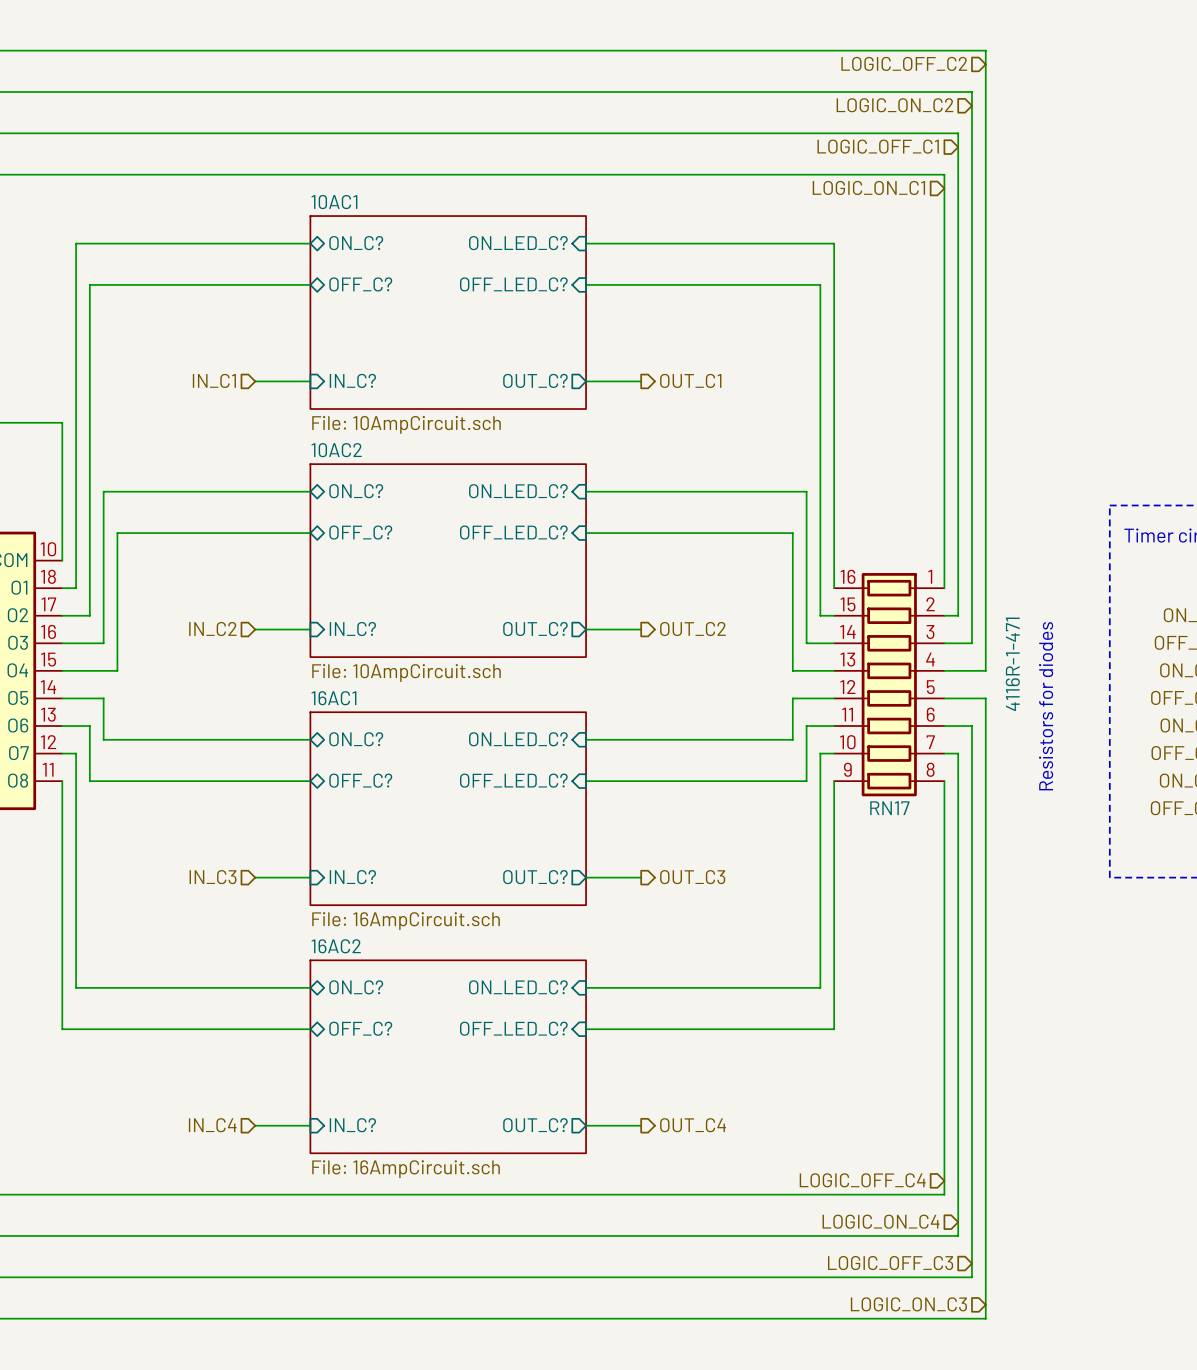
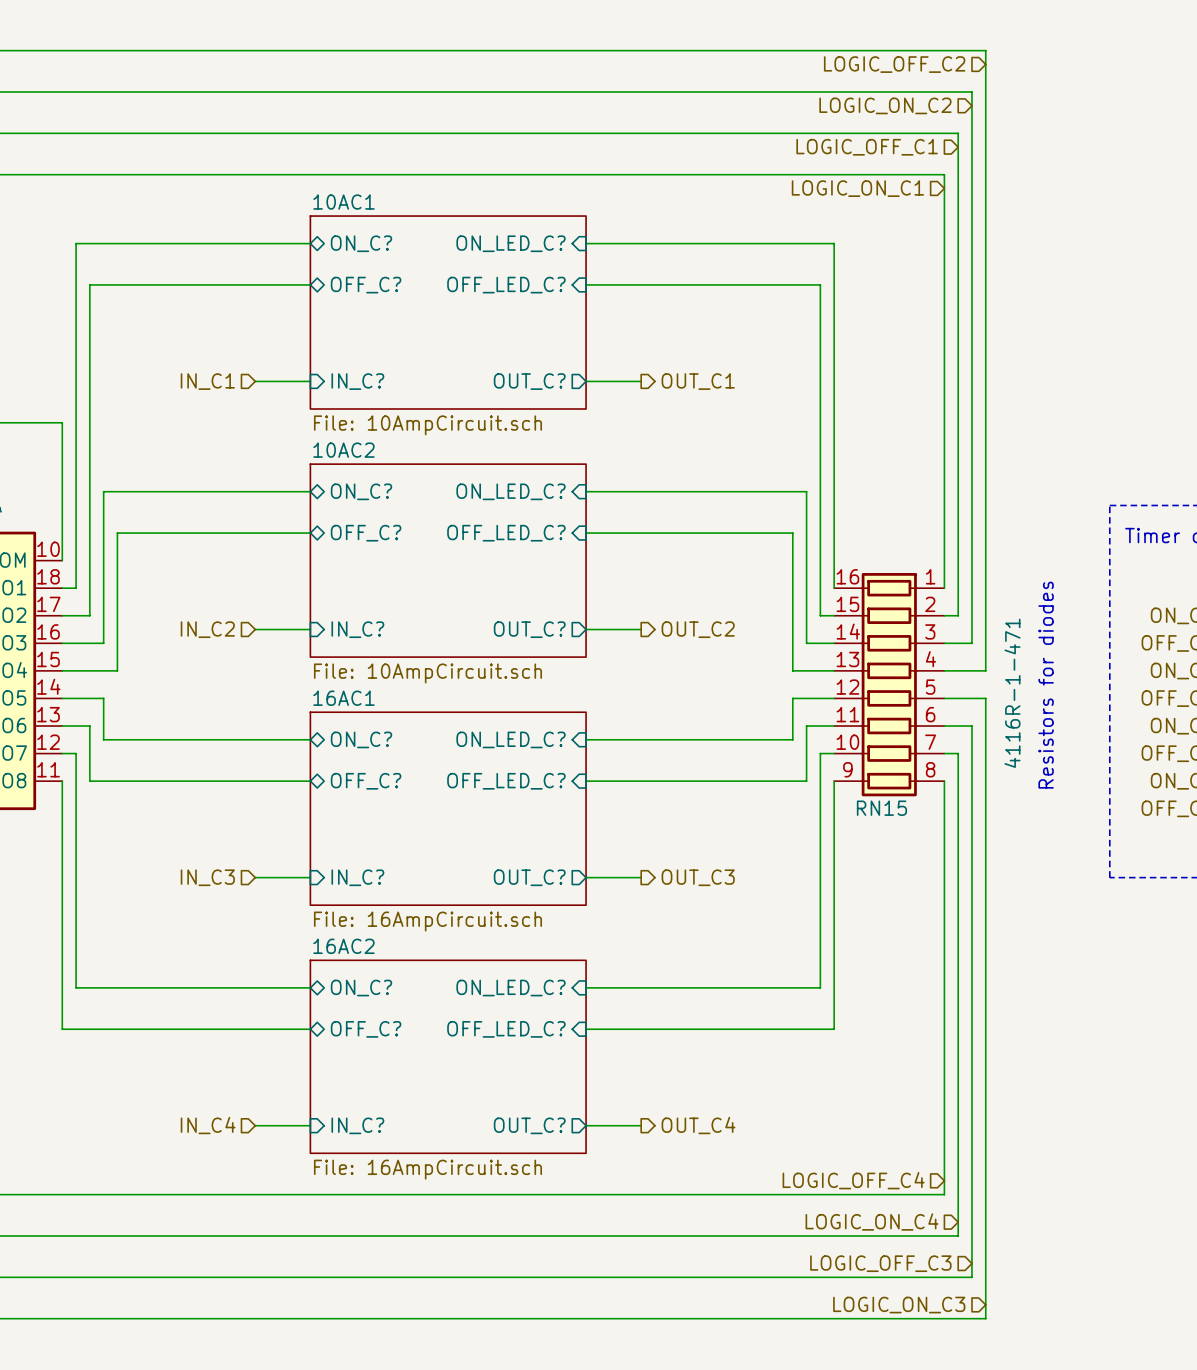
RN17 name: RN17 (889, 808) -> RN15 (881, 808)

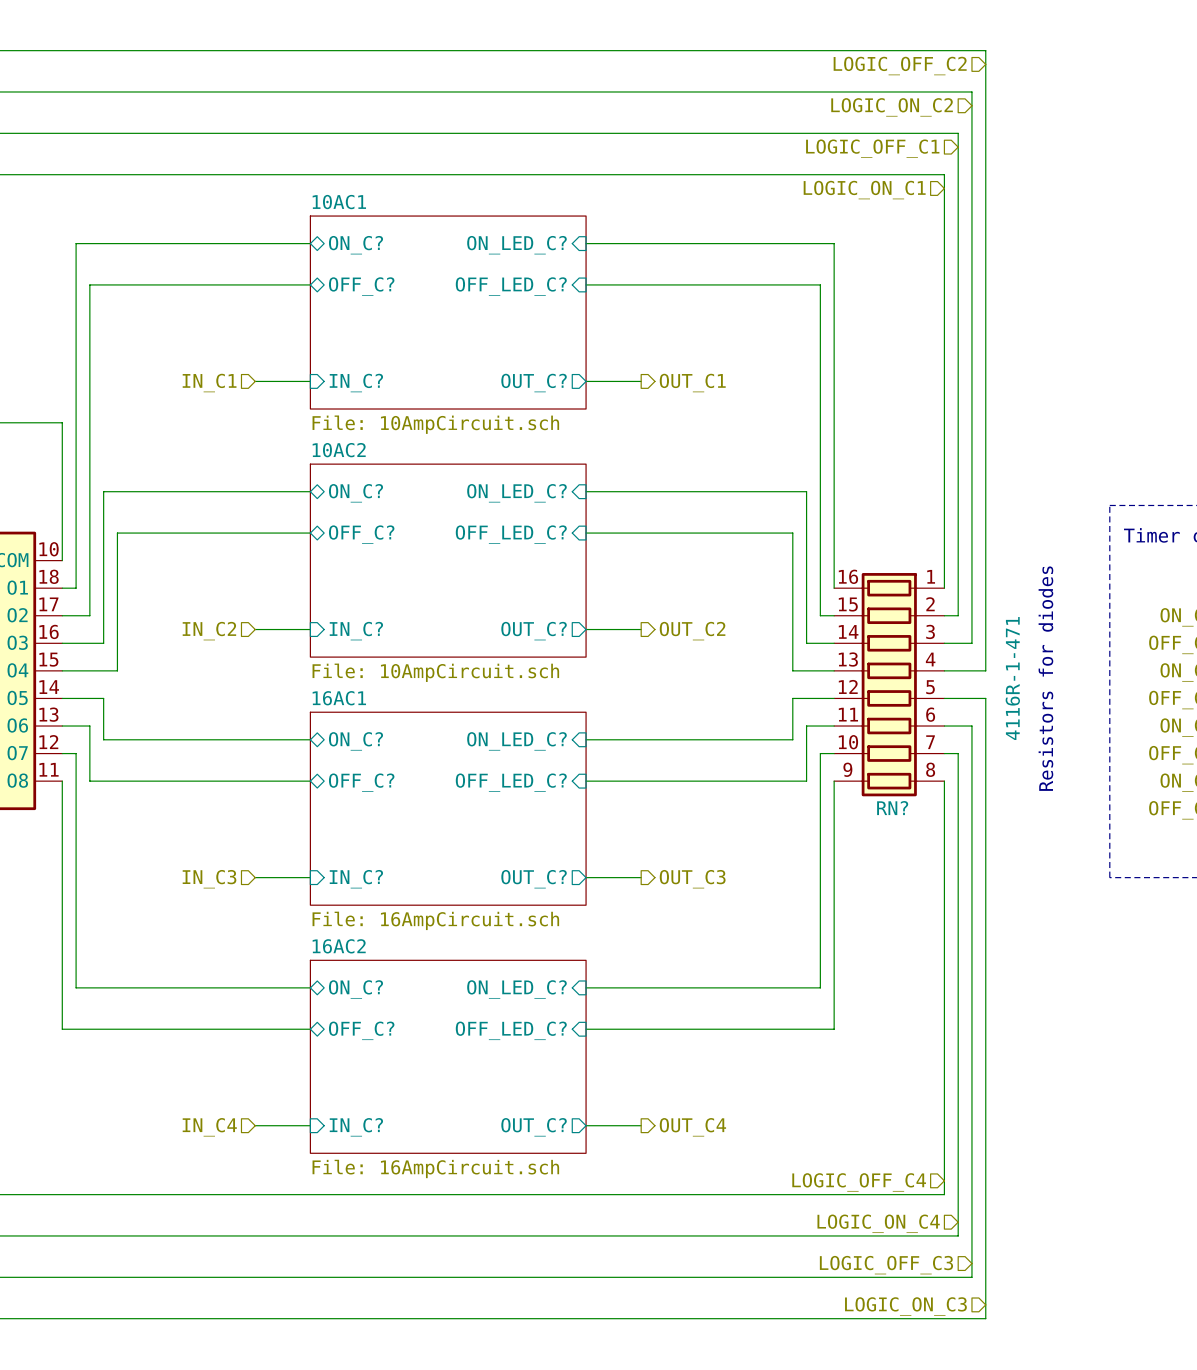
RN15 name: RN15 (881, 808) -> RN? (892, 808)

